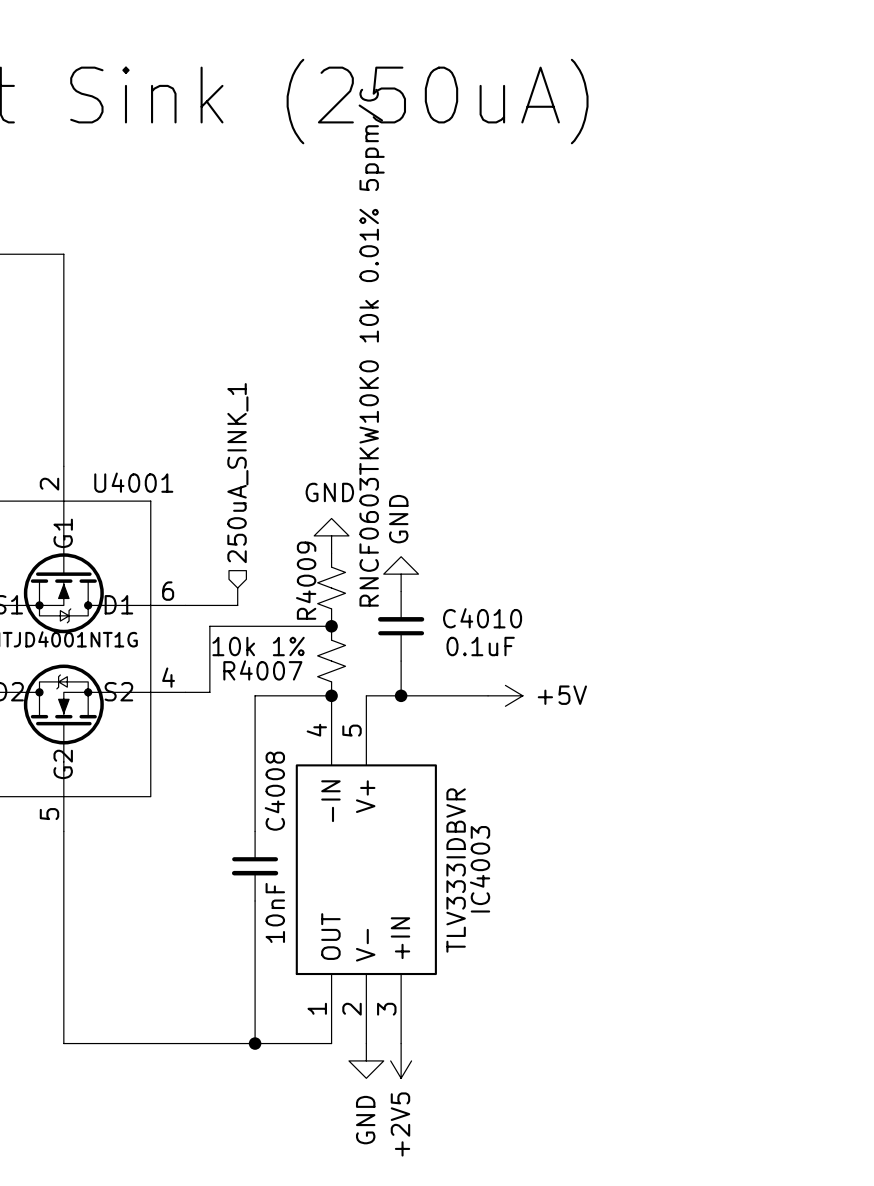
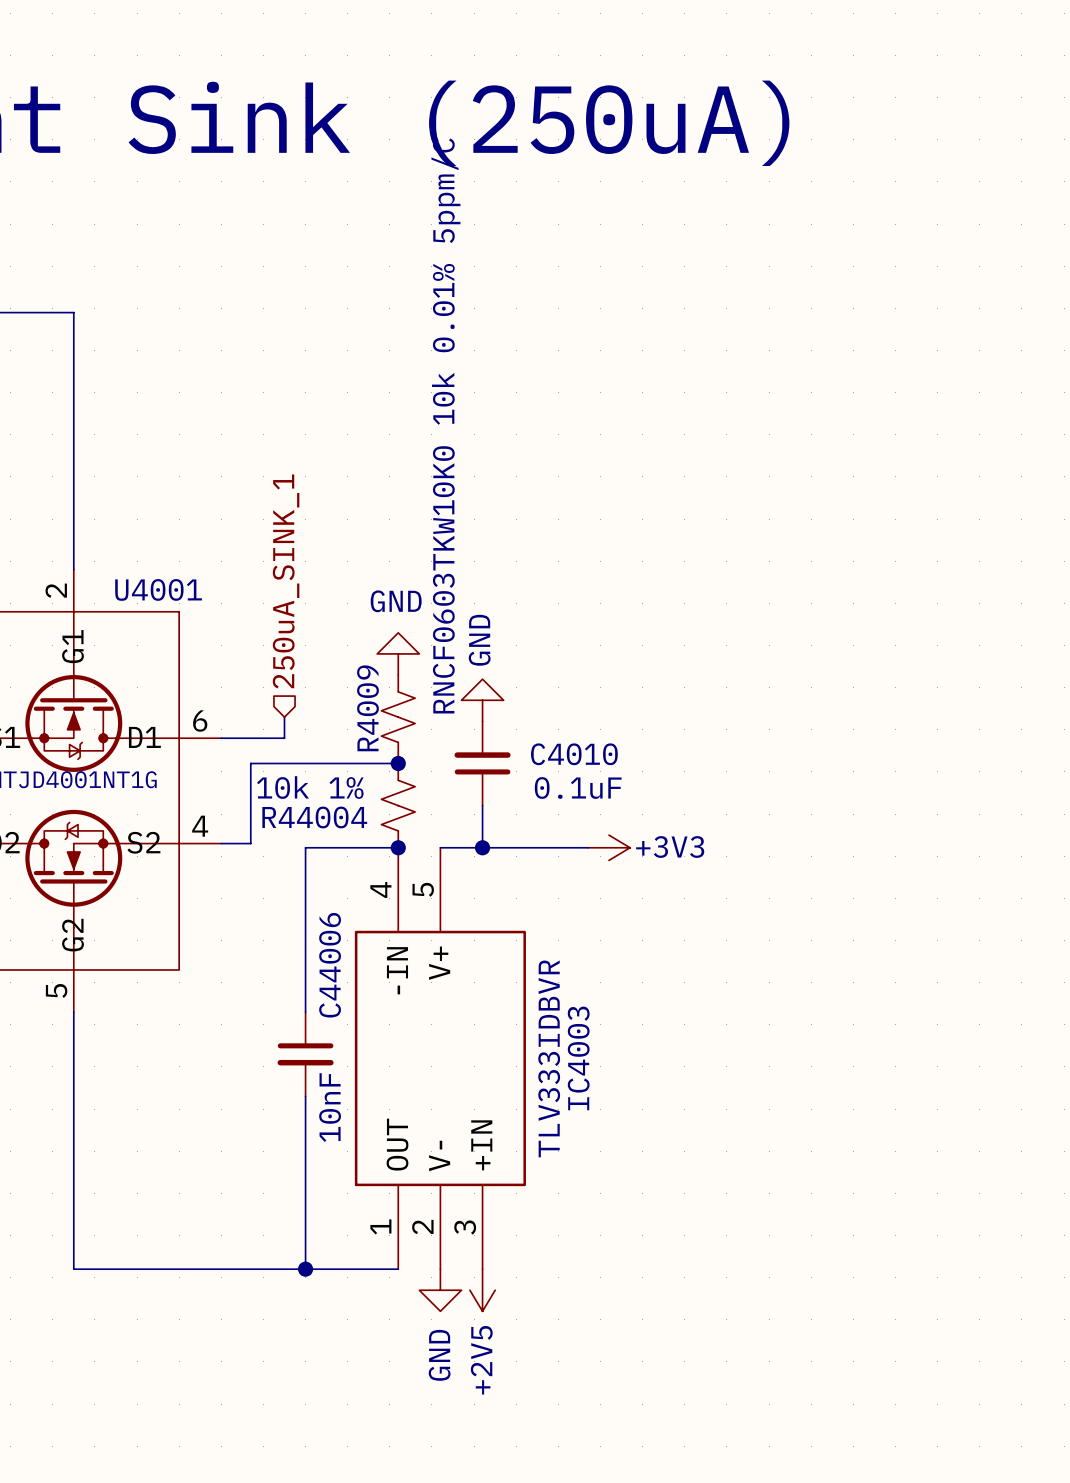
R4007 name: R4007 (262, 670) -> R44004 (314, 817)
power symbol: +5V (505, 695) -> +3V3 (608, 847)
C4008 name: C4008 (274, 791) -> C44006 (330, 965)

